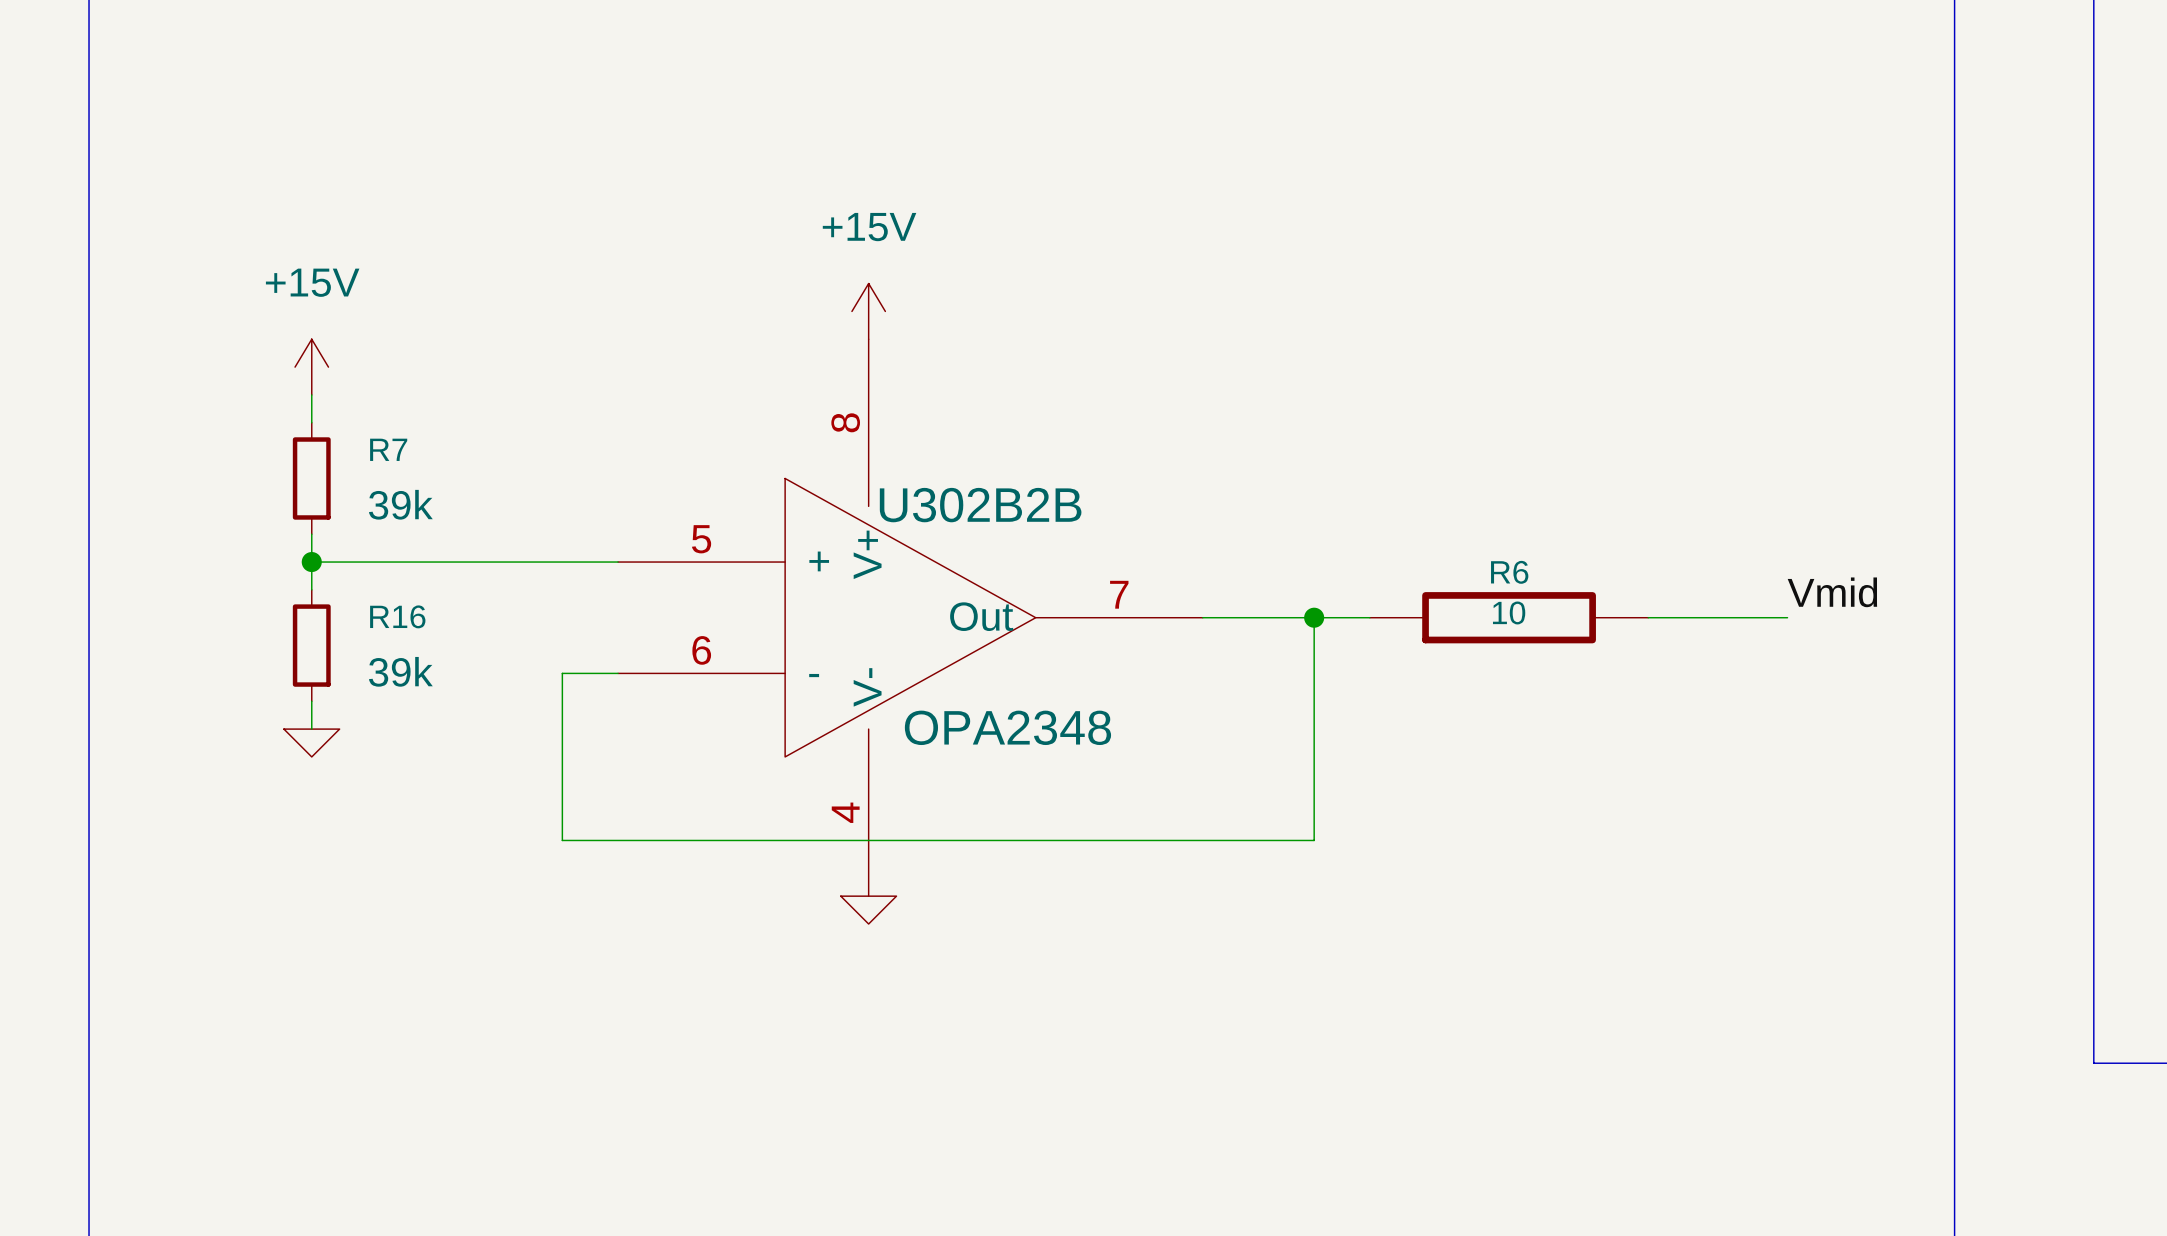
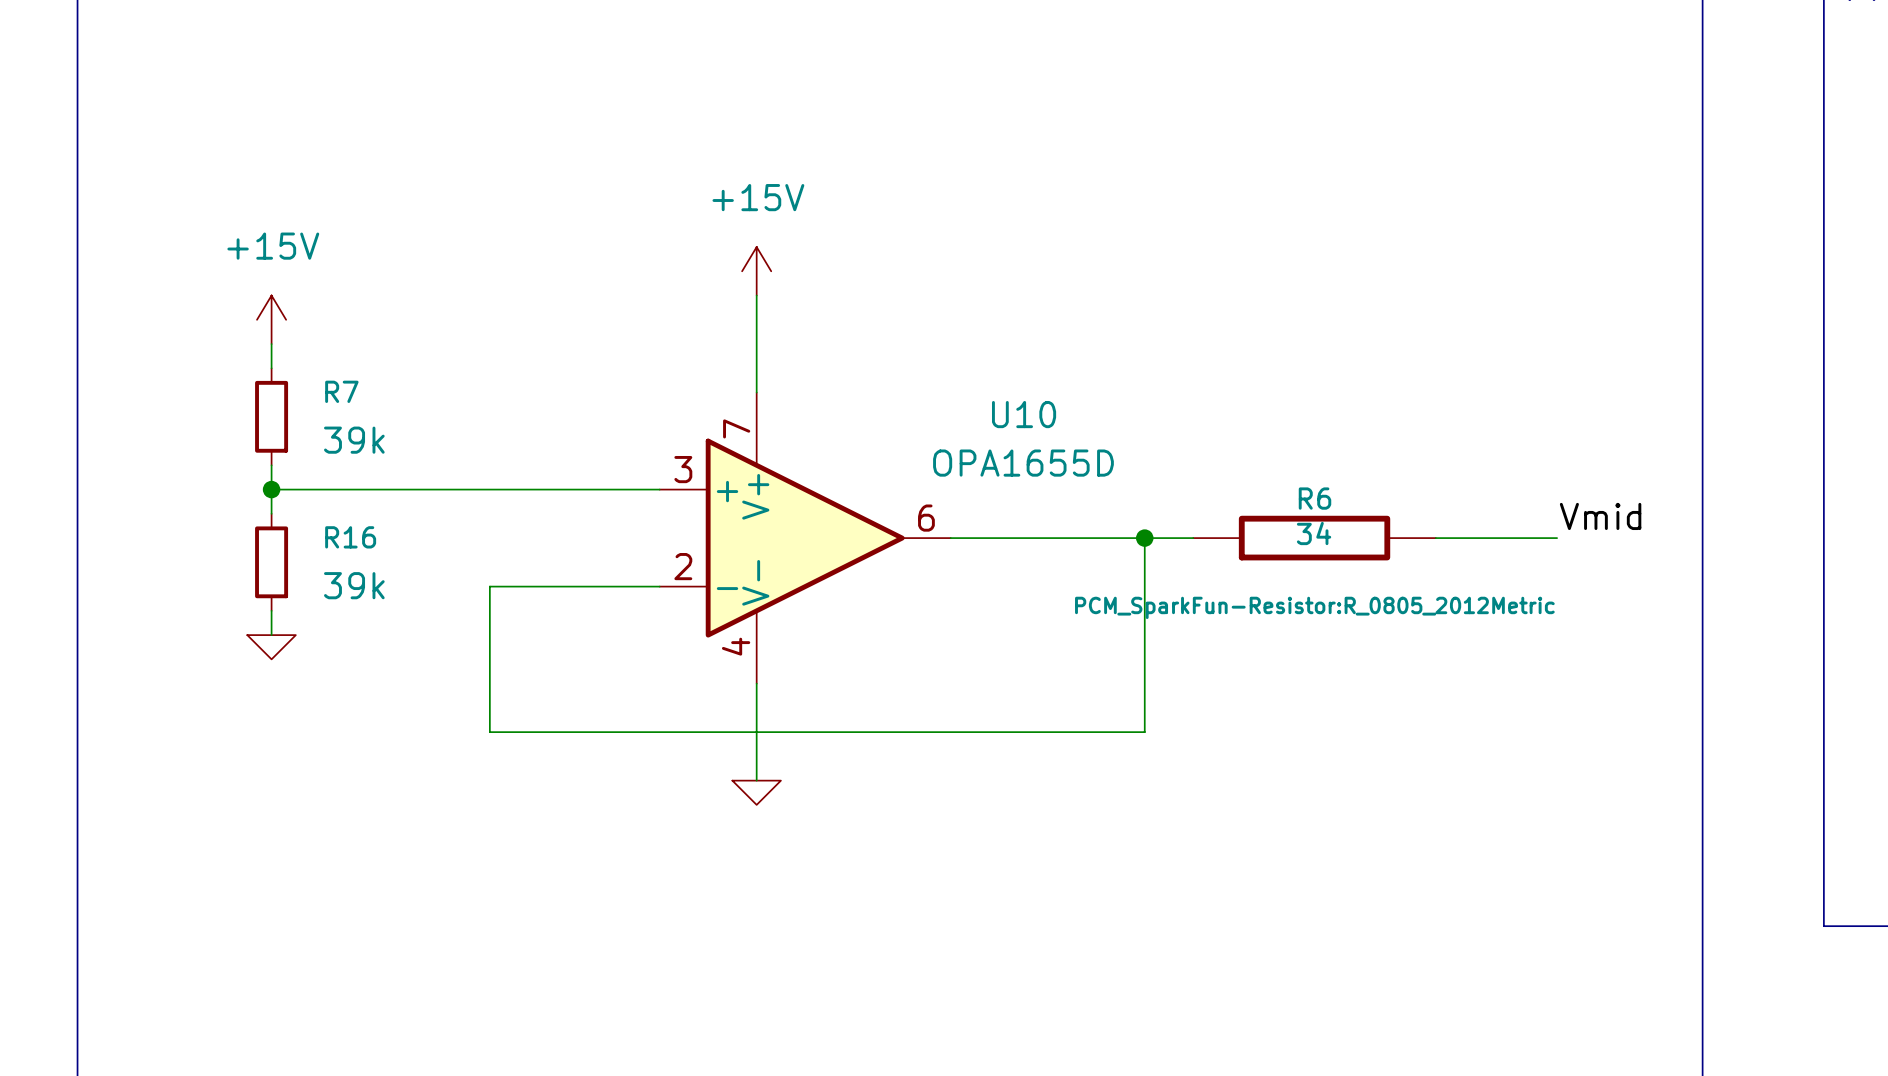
R6 value: 10 (1509, 612) -> 34 (1314, 533)
U302B2B: OPA2348 (910, 617) -> none
U10: none -> OPA1655D (805, 538)
R6 text: none -> PCM_SparkFun-Resistor:R_0805_2012Metric (1314, 607)

